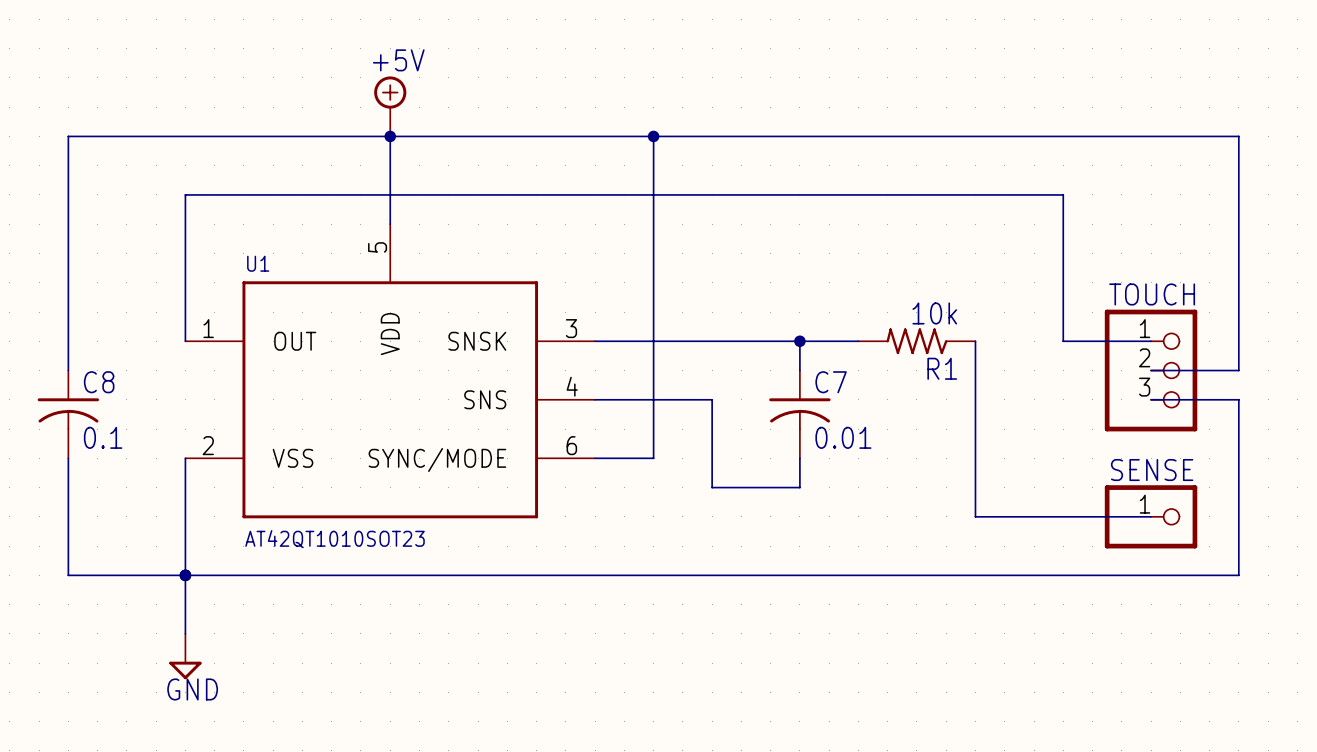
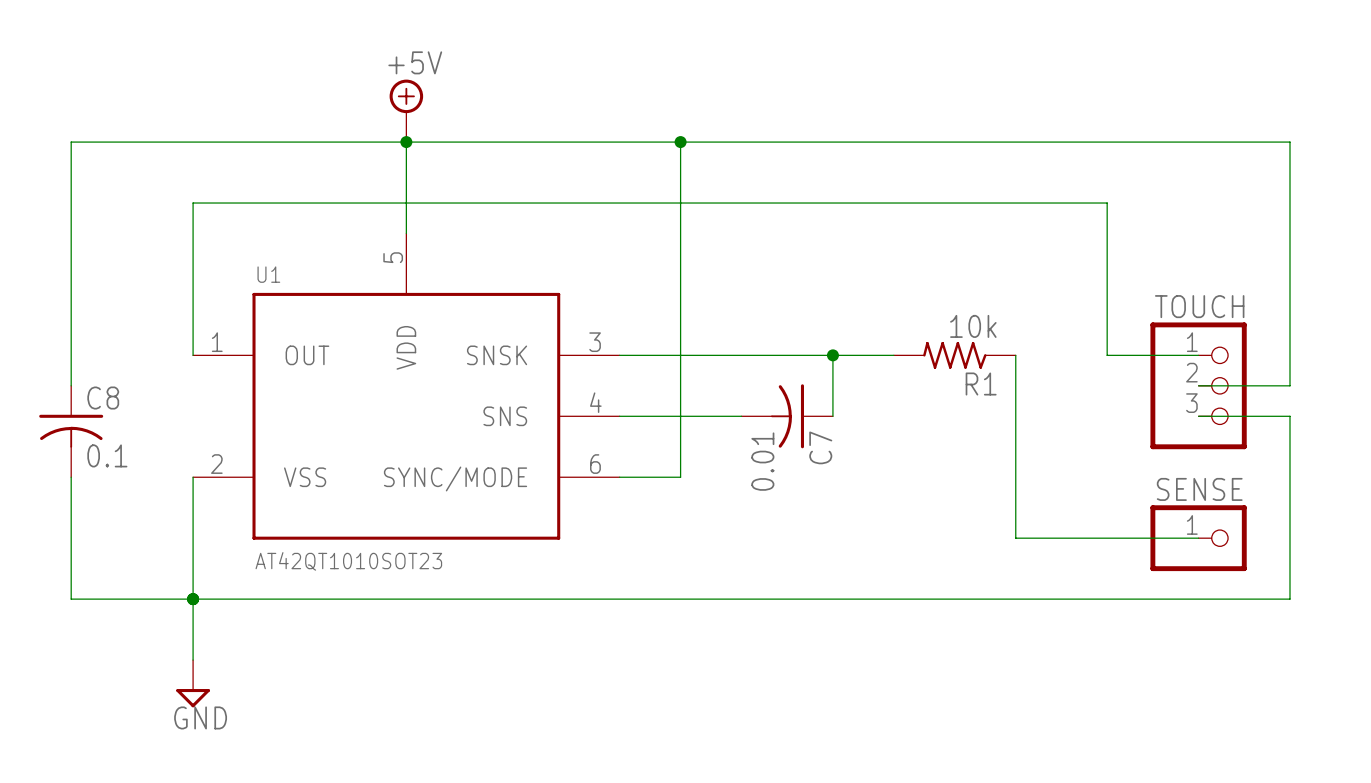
wire: (712, 399) (712, 487) (799, 487) (799, 458) -> none
C7 rotation: 0° (799, 414) -> 90° clockwise (787, 416)

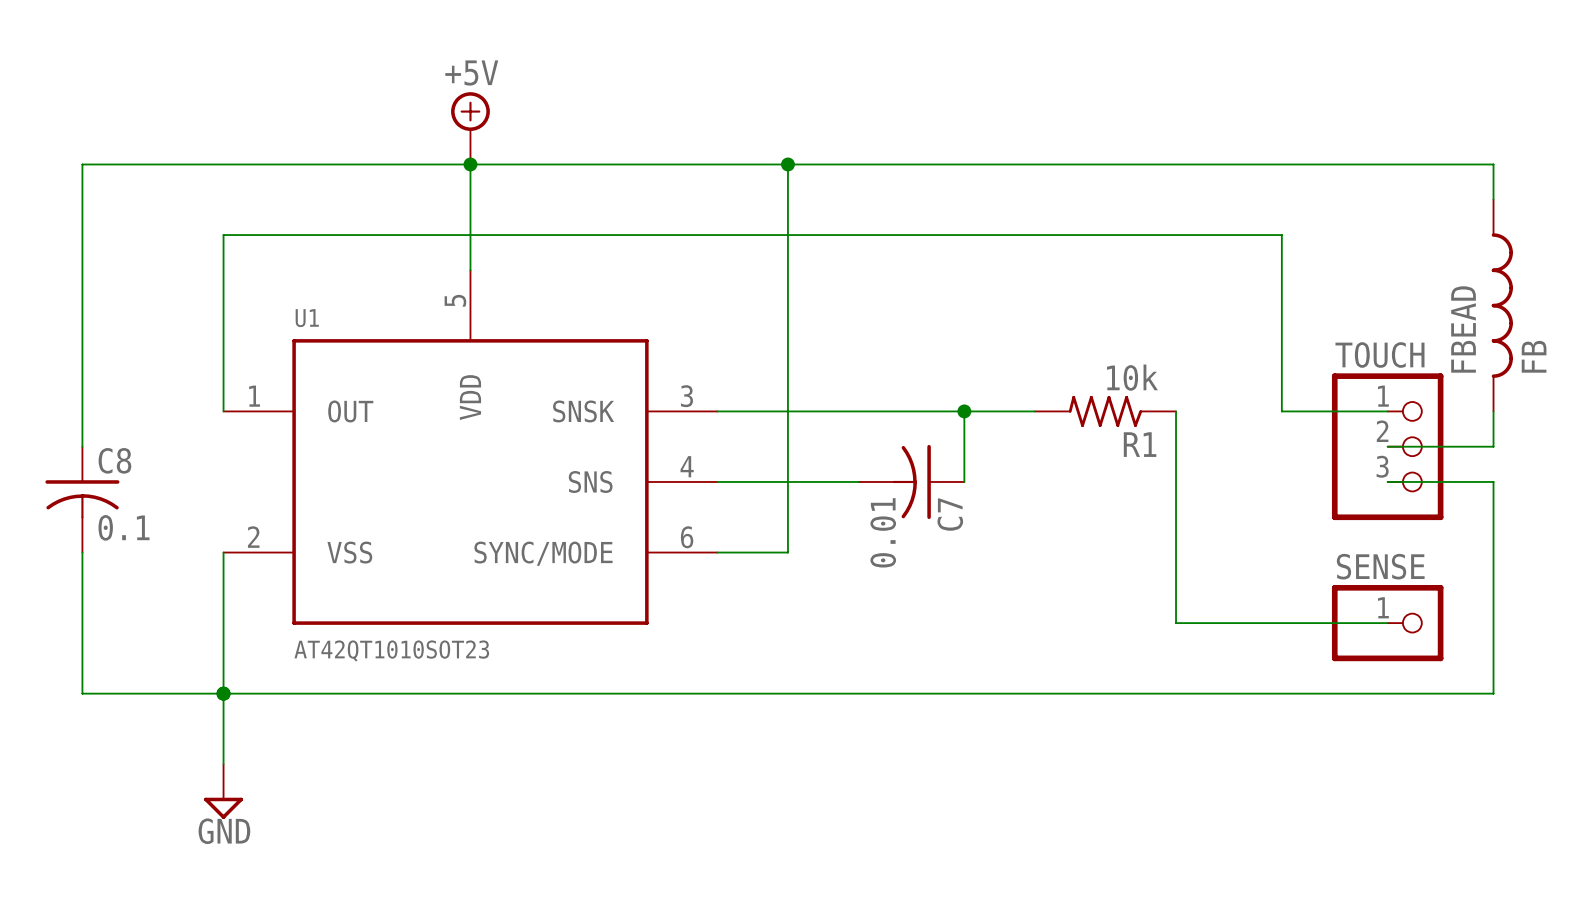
wire: (1289, 172) (1289, 355) -> none
FBEAD: none -> FB (1502, 305)

